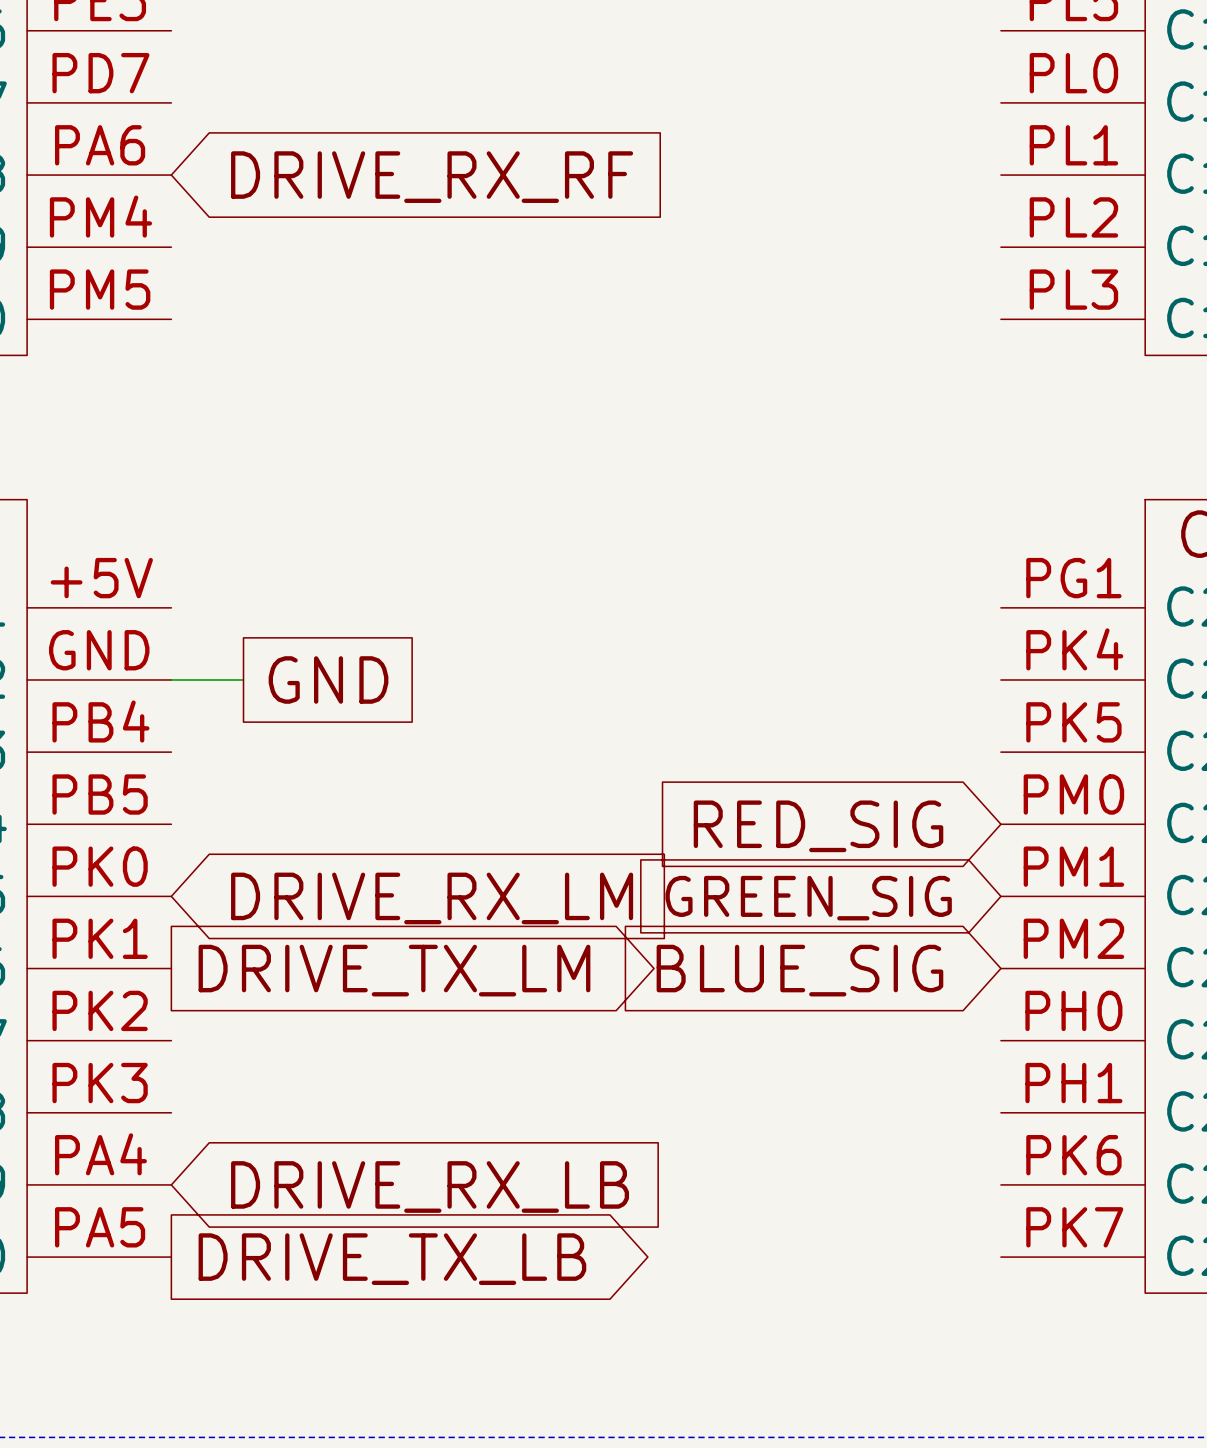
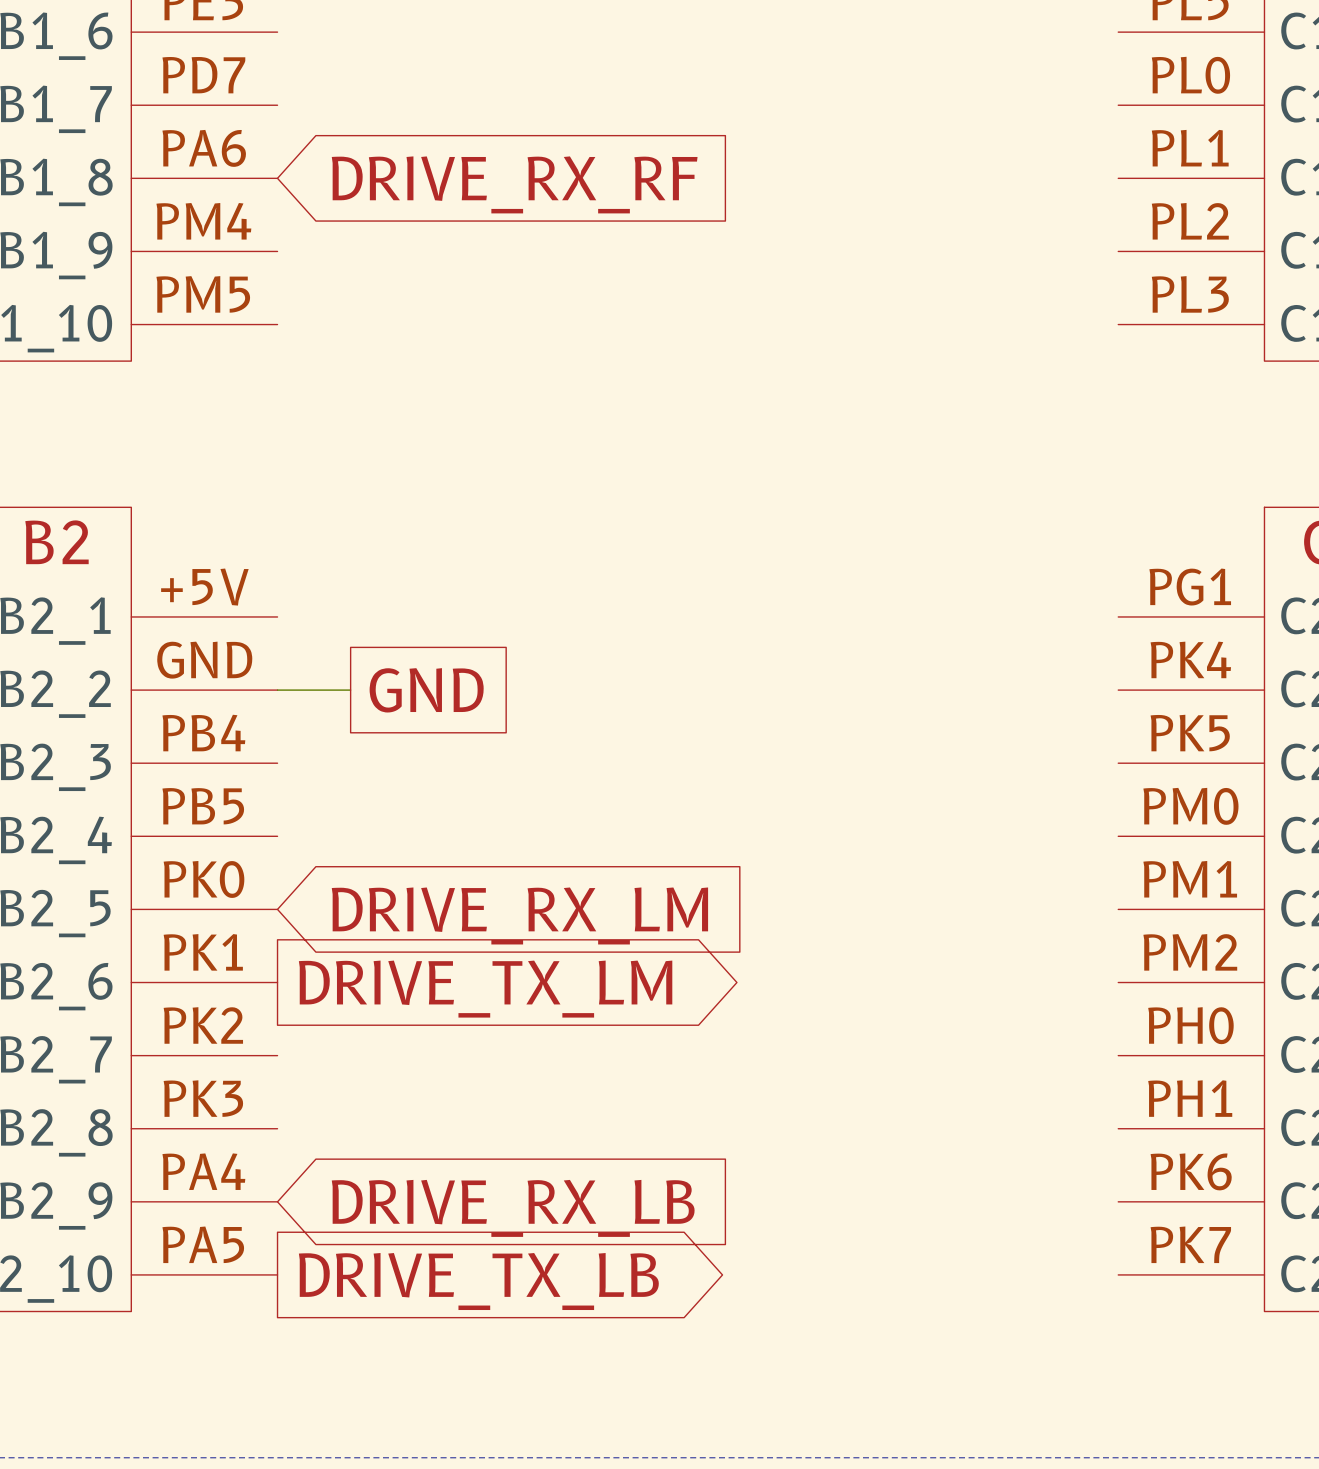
global label: RED_SIG (818, 826) -> none
global label: GREEN_SIG (808, 898) -> none
global label: BLUE_SIG (799, 970) -> none

